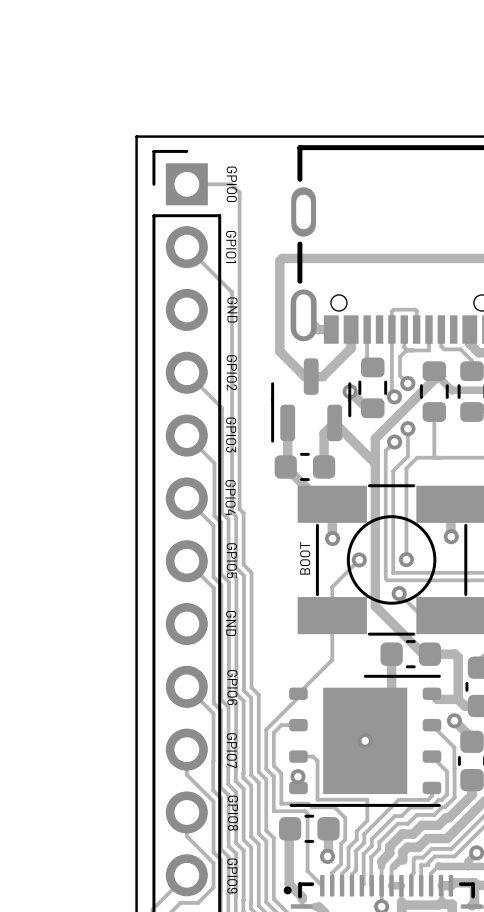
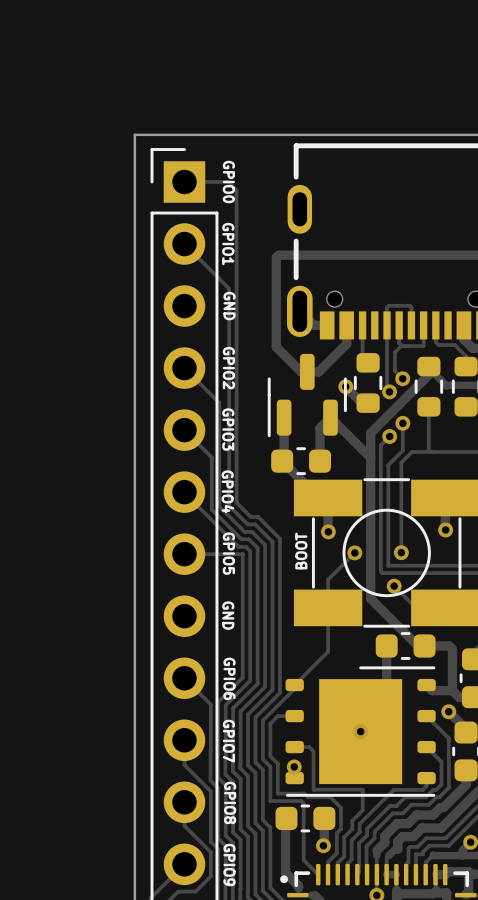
track: (243, 513) (243, 564) (251, 572) (251, 687) (258, 694) (258, 726) -> (240, 506) (250, 516) (258, 516) (279, 538) (279, 693) (255, 717)
track: (236, 516) (236, 567) (243, 575) (243, 690) (251, 697) (251, 723) -> (233, 509) (247, 524) (255, 524) (272, 541) (272, 689) (248, 714)
track: (228, 519) (228, 570) (236, 578) (236, 693) (243, 701) (243, 720) -> (225, 512) (244, 531) (252, 531) (265, 544) (265, 686) (240, 711)
track: (221, 522) (221, 574) (228, 581) (228, 696) (236, 704) (236, 717) -> (218, 516) (241, 539) (248, 539) (257, 548) (257, 683) (233, 708)
track: (213, 525) (213, 577) (221, 585) (221, 700) (228, 707) (228, 714) -> (210, 519) (238, 546) (245, 546) (250, 551) (250, 680) (225, 705)
track: (186, 561) (213, 588) (213, 703) (221, 710) -> (184, 554) (242, 554) (242, 677) (218, 702)

